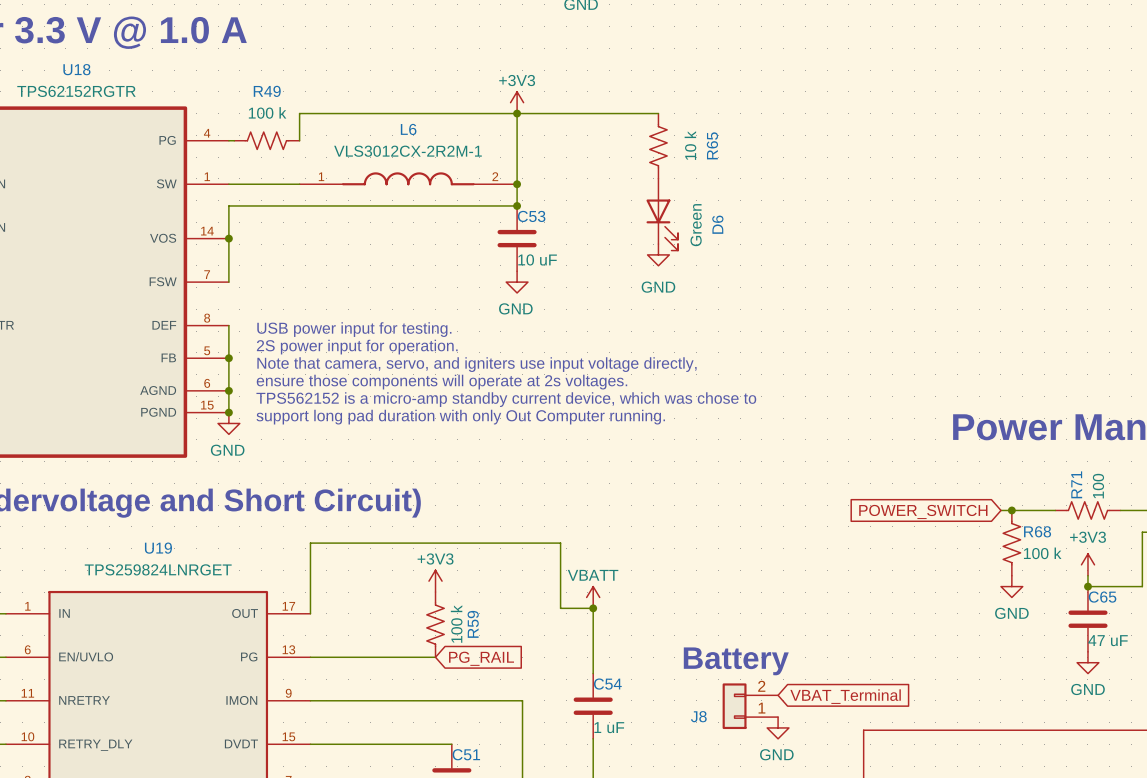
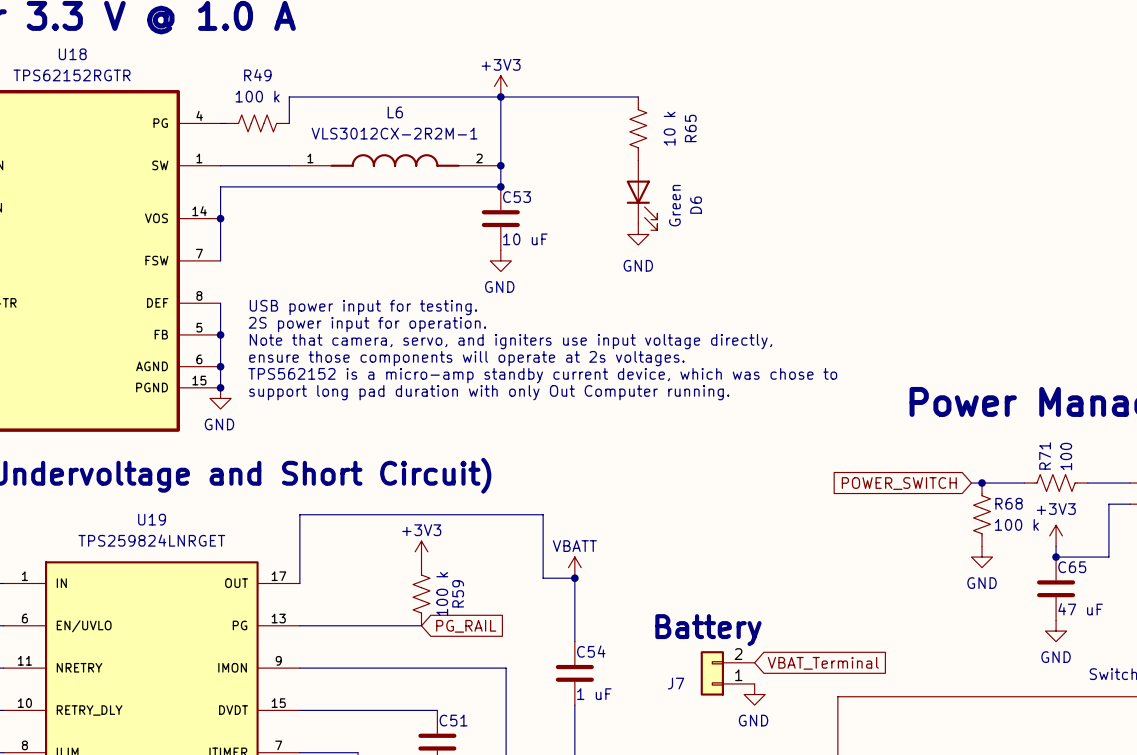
J8 name: J8 (698, 716) -> J7 (676, 683)

